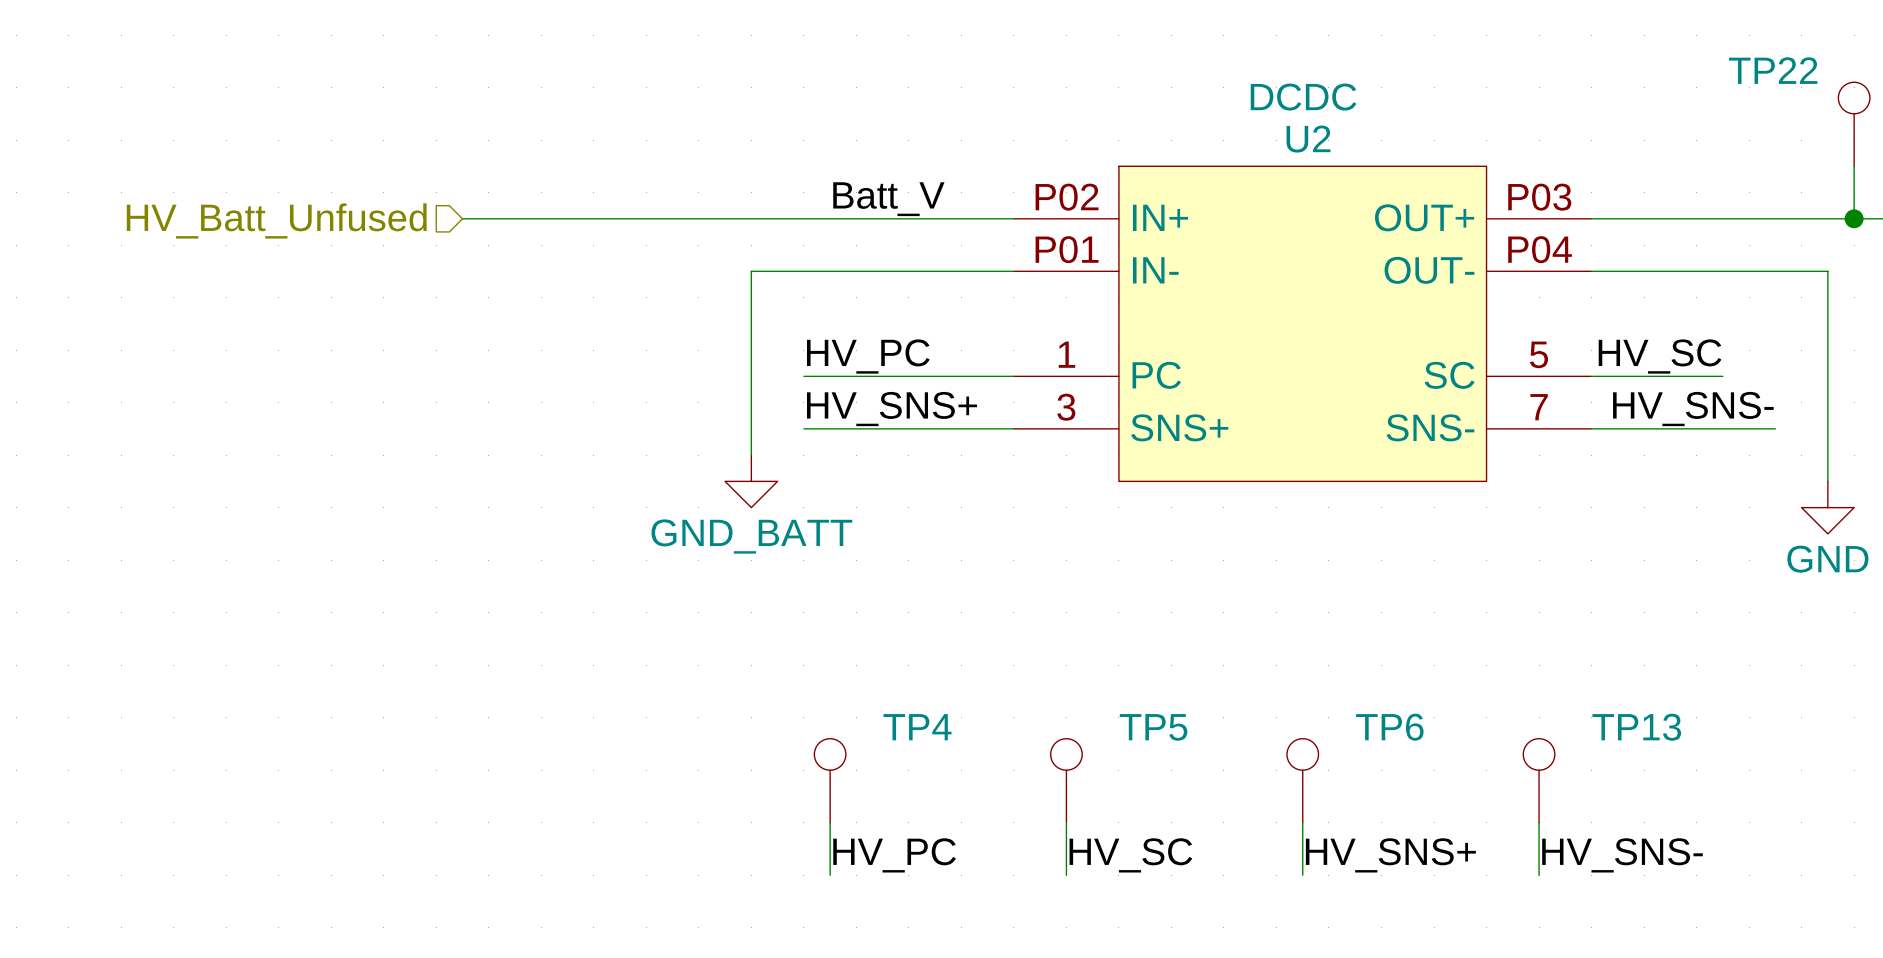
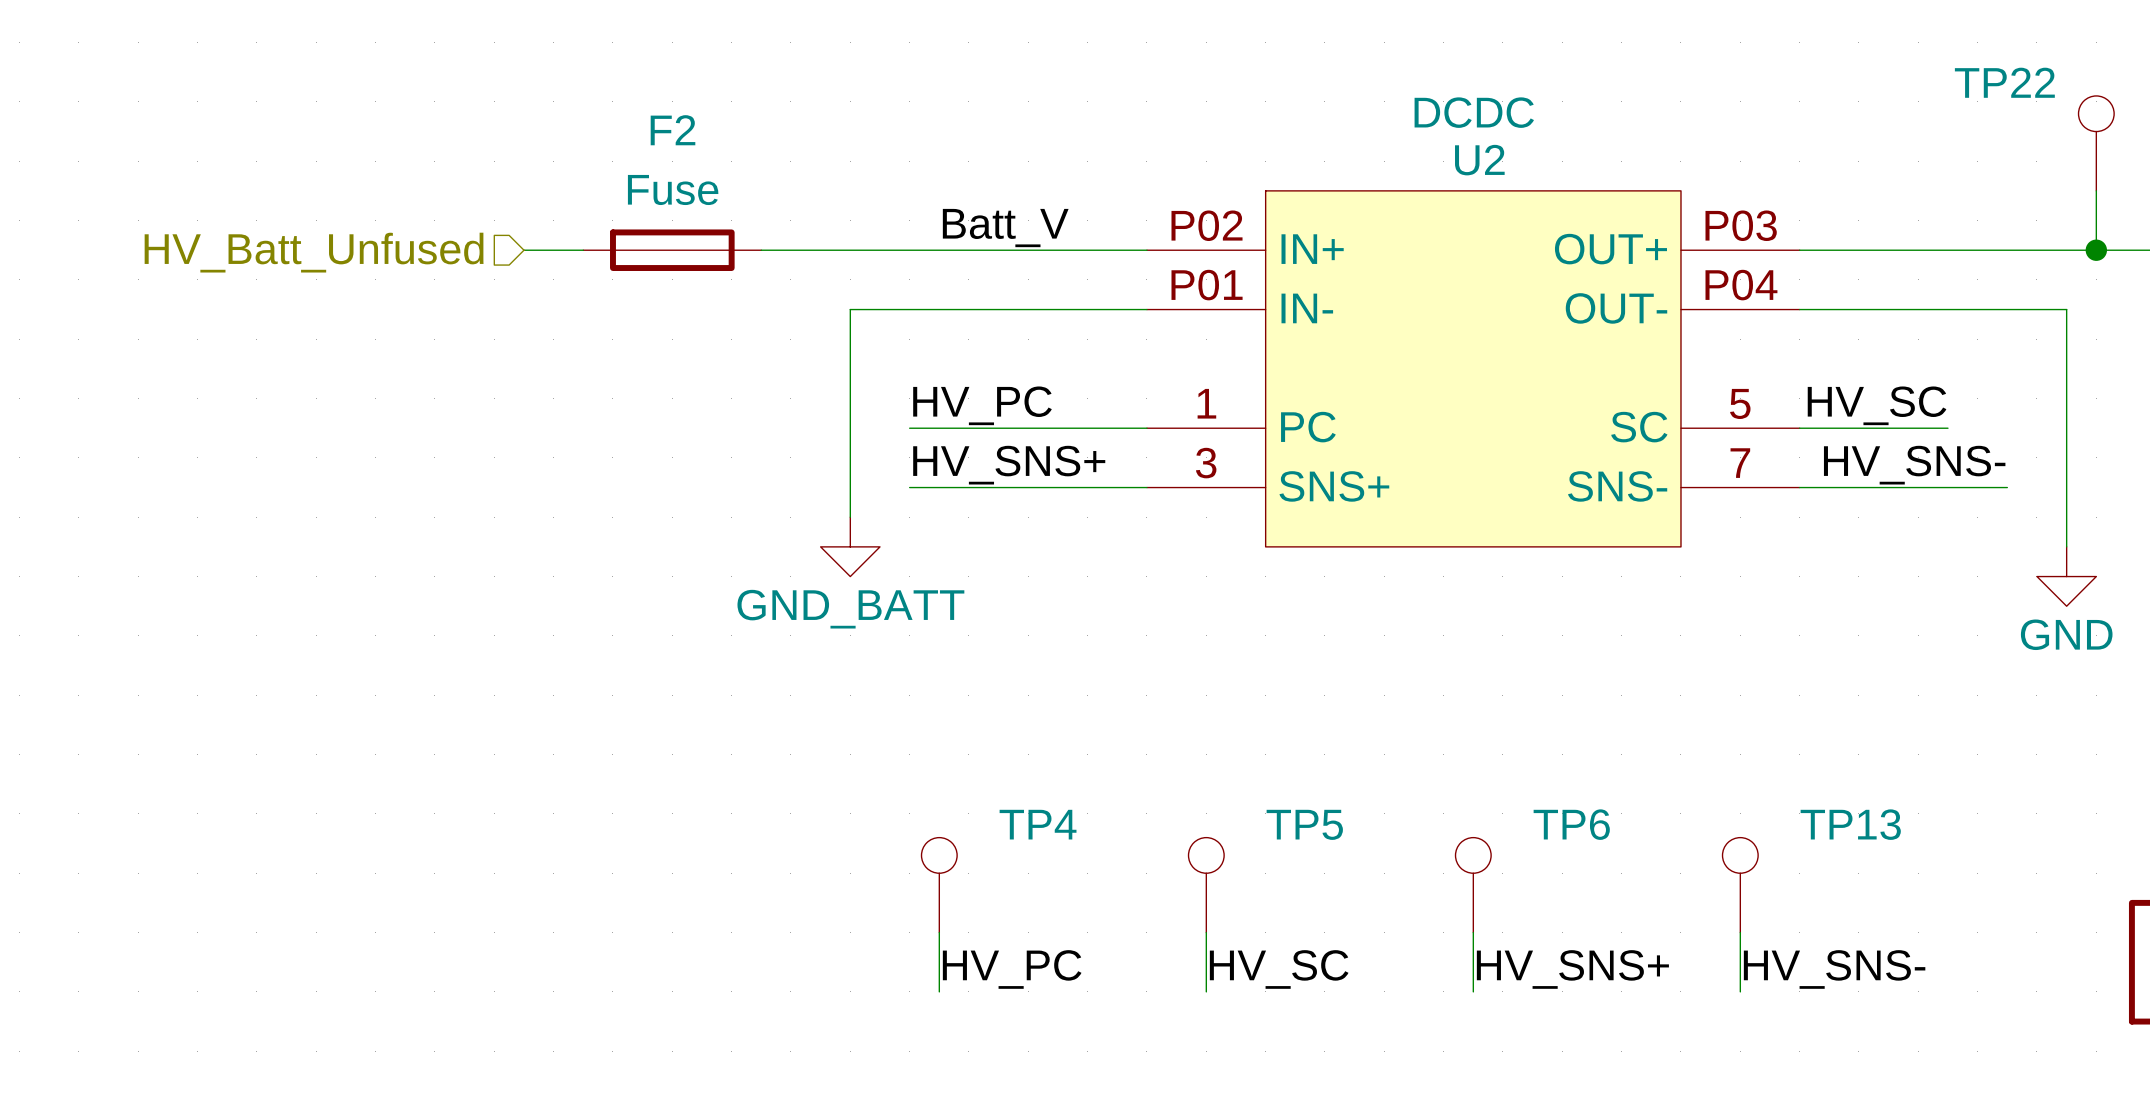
F2: none -> Fuse (672, 250)

